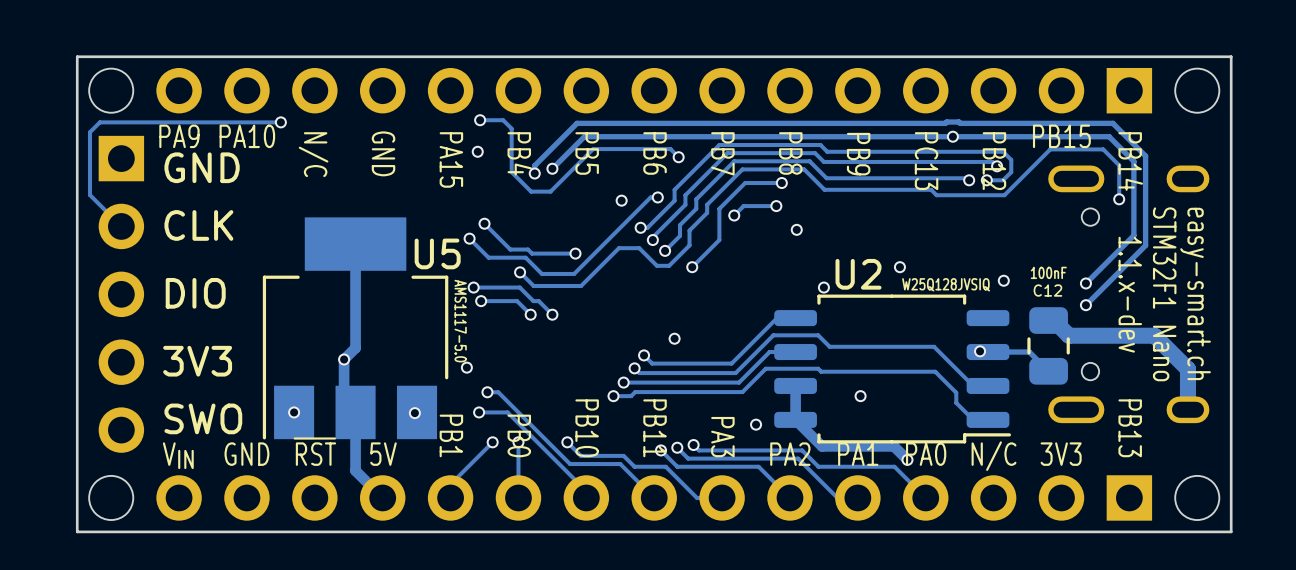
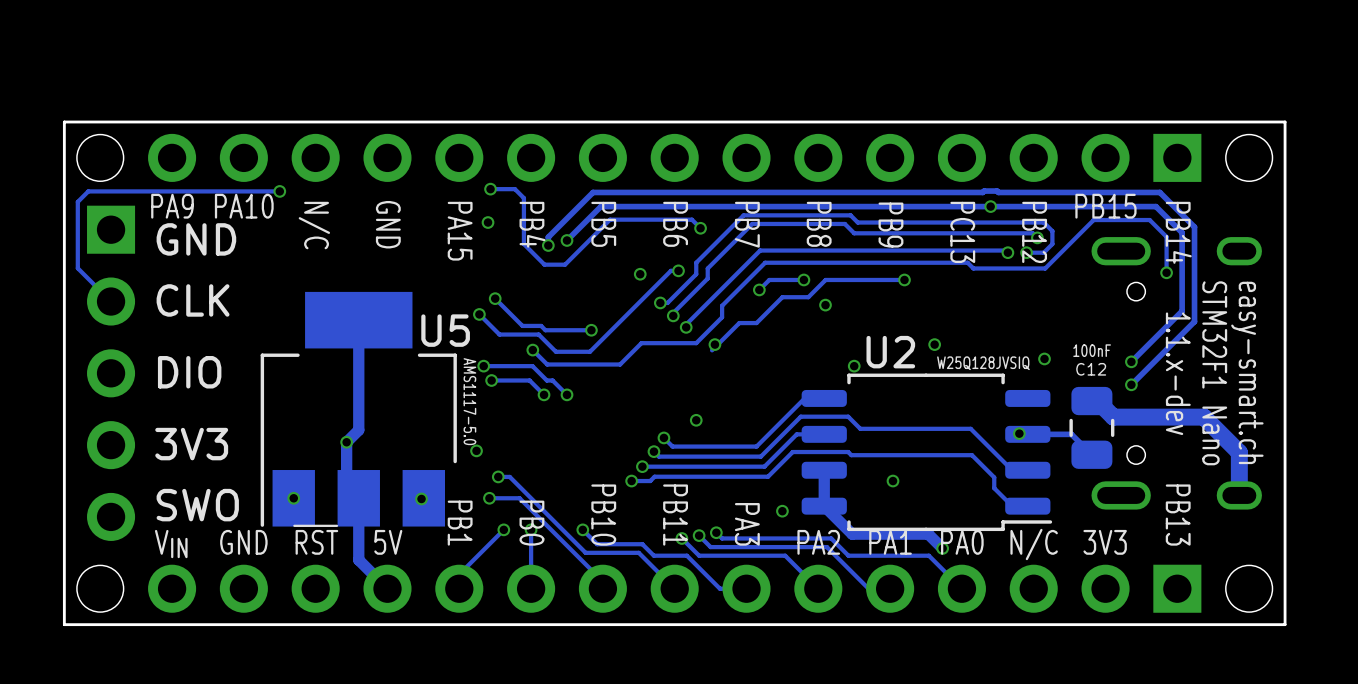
track: (826, 178) (809, 161) (734, 161) (696, 199) (696, 208) (680, 225) (680, 235) (665, 250) -> (857, 250) (760, 250) (686, 324) (686, 327)
track: (781, 183) (745, 183) (719, 208) (719, 240) (692, 267) -> none
via position: (781, 183) -> (904, 279)
track: (824, 189) (804, 169) (742, 169) (707, 204) (707, 212) (689, 230) (689, 245) (669, 265) -> (854, 262) (765, 262) (722, 305) (722, 317) (696, 343) (690, 343)
track: none -> (904, 279) (825, 279) (808, 297) (782, 297) (756, 323) (739, 323) (712, 350)
track: (656, 265) (639, 248) (618, 248) (581, 285) -> (677, 343) (641, 343) (620, 364) (597, 364)

